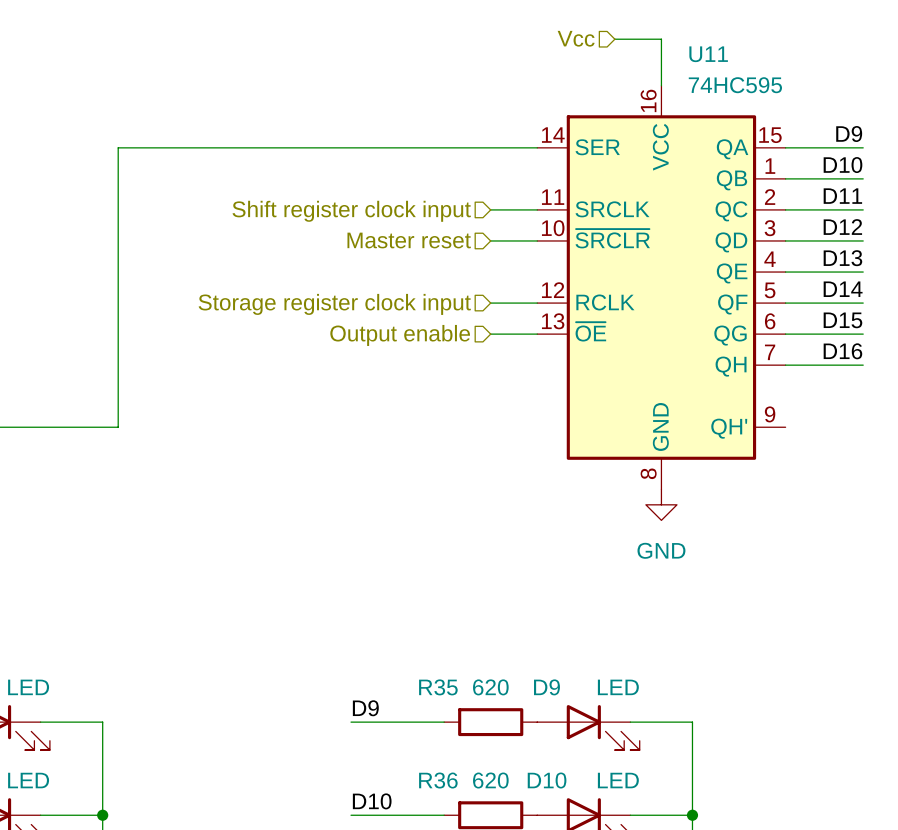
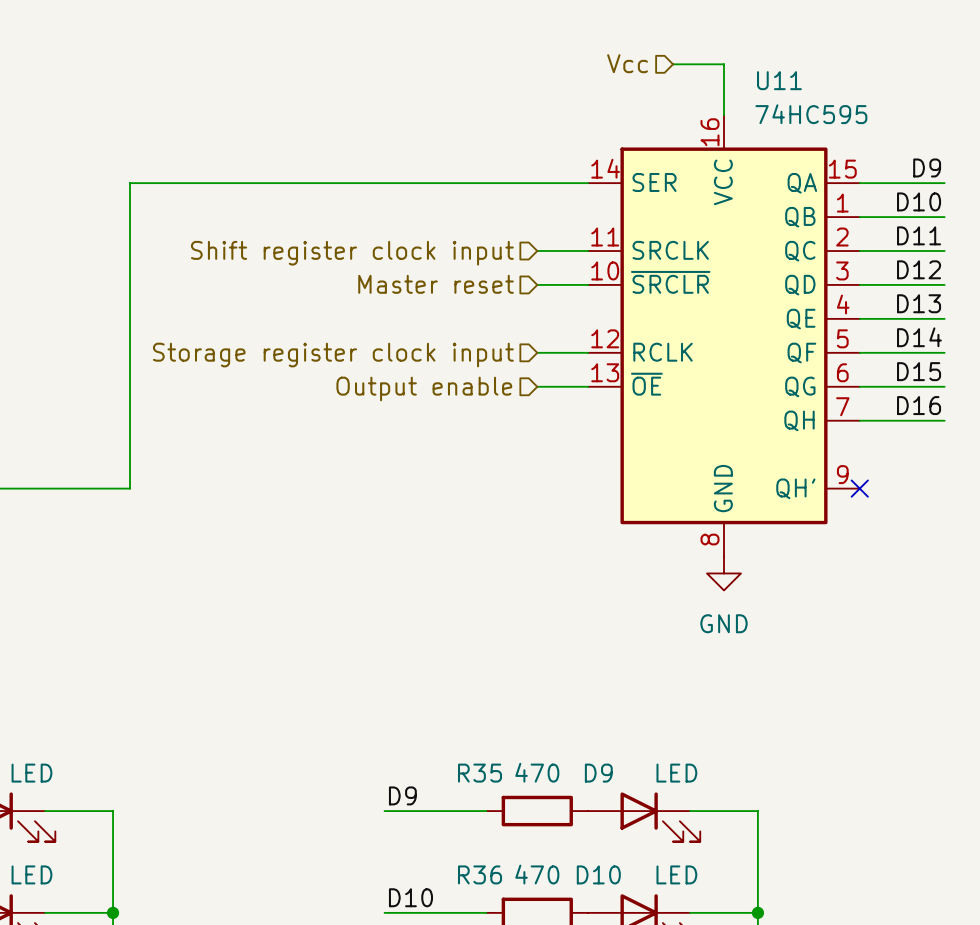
no-connect mark: none -> (859, 488)
R35 value: 620 (490, 687) -> 470 (537, 772)
R36 value: 620 (490, 780) -> 470 (537, 874)

